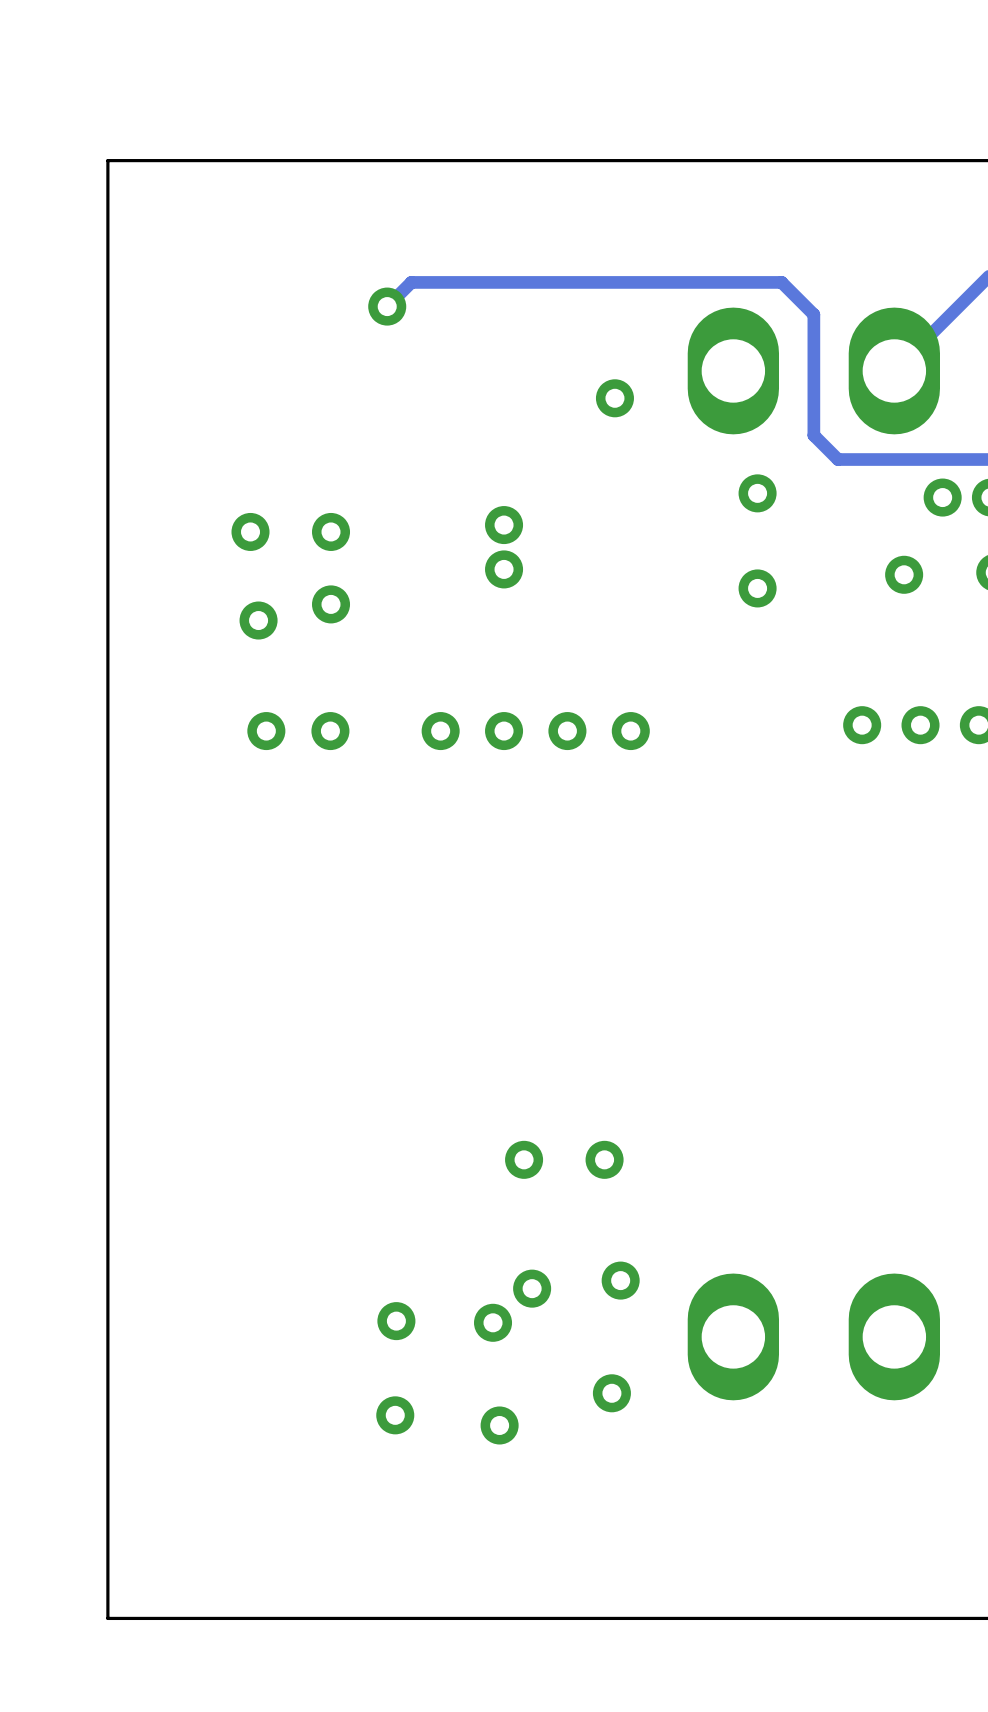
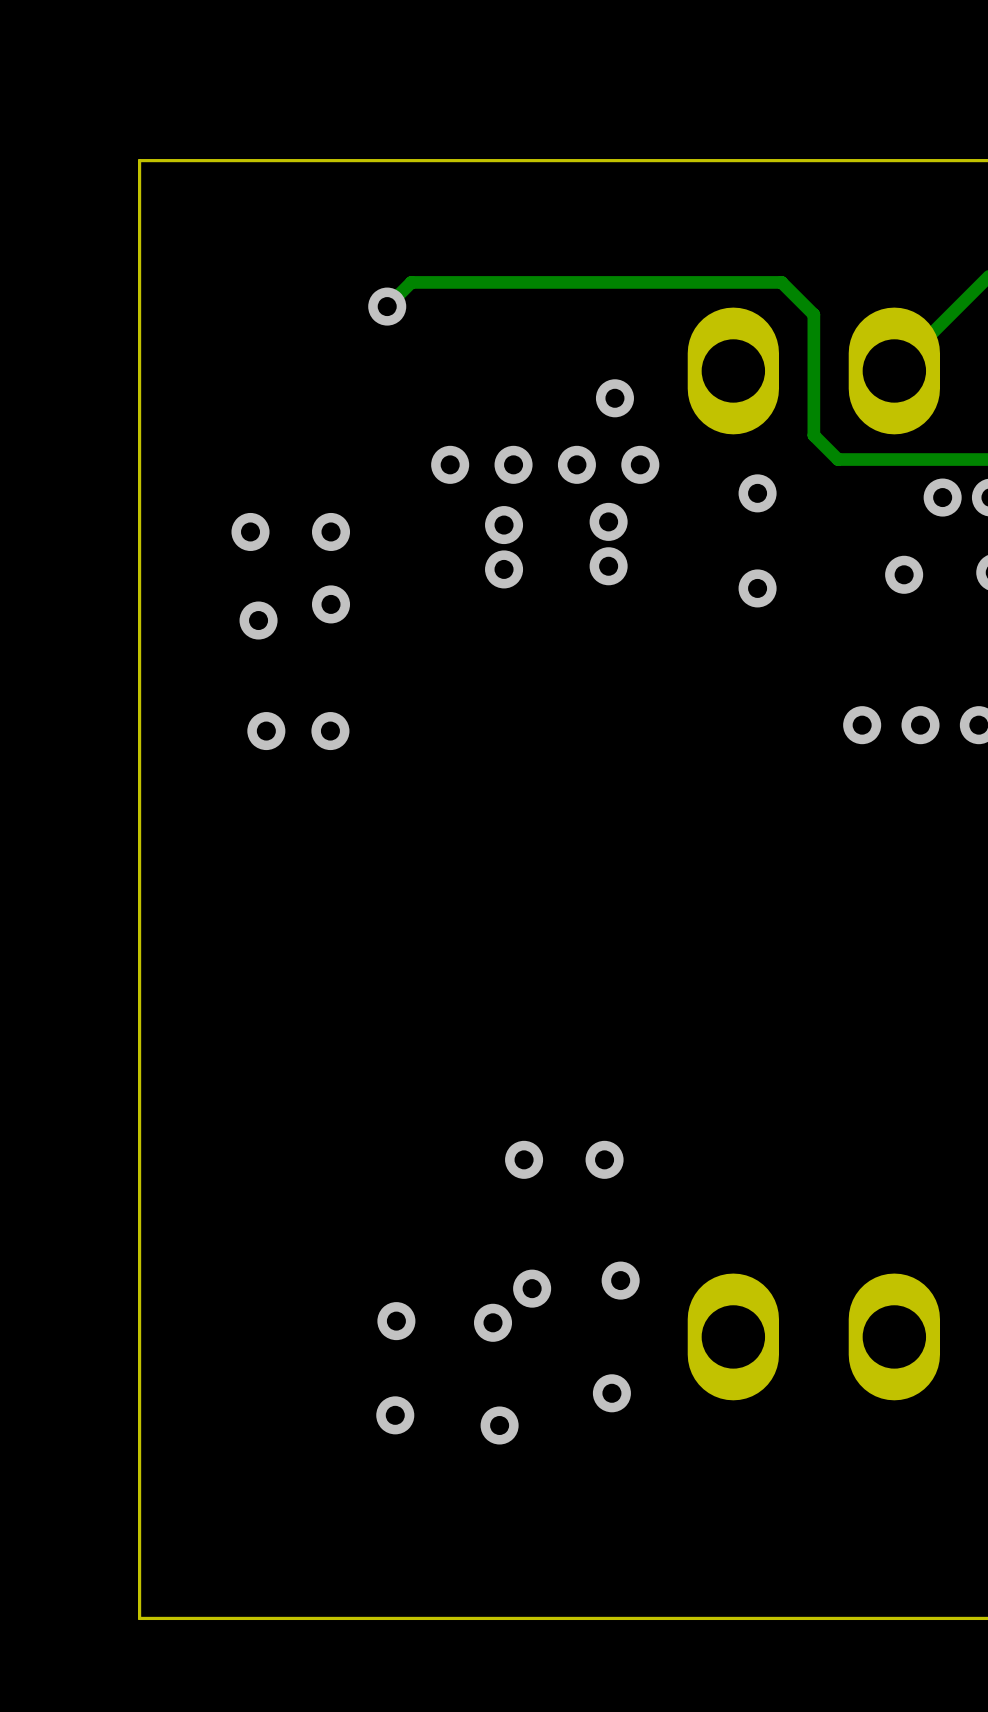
board edge: (139, 160) (107, 160) (107, 1618) (139, 1618) -> (139, 160) (139, 1618)
via: none -> (450, 464)
via: none -> (513, 464)
via: none -> (576, 464)
via: none -> (640, 464)
via: none -> (608, 521)
via: none -> (608, 566)
via: (440, 731) -> none
via: (504, 731) -> none
via: (567, 731) -> none
via: (630, 731) -> none

